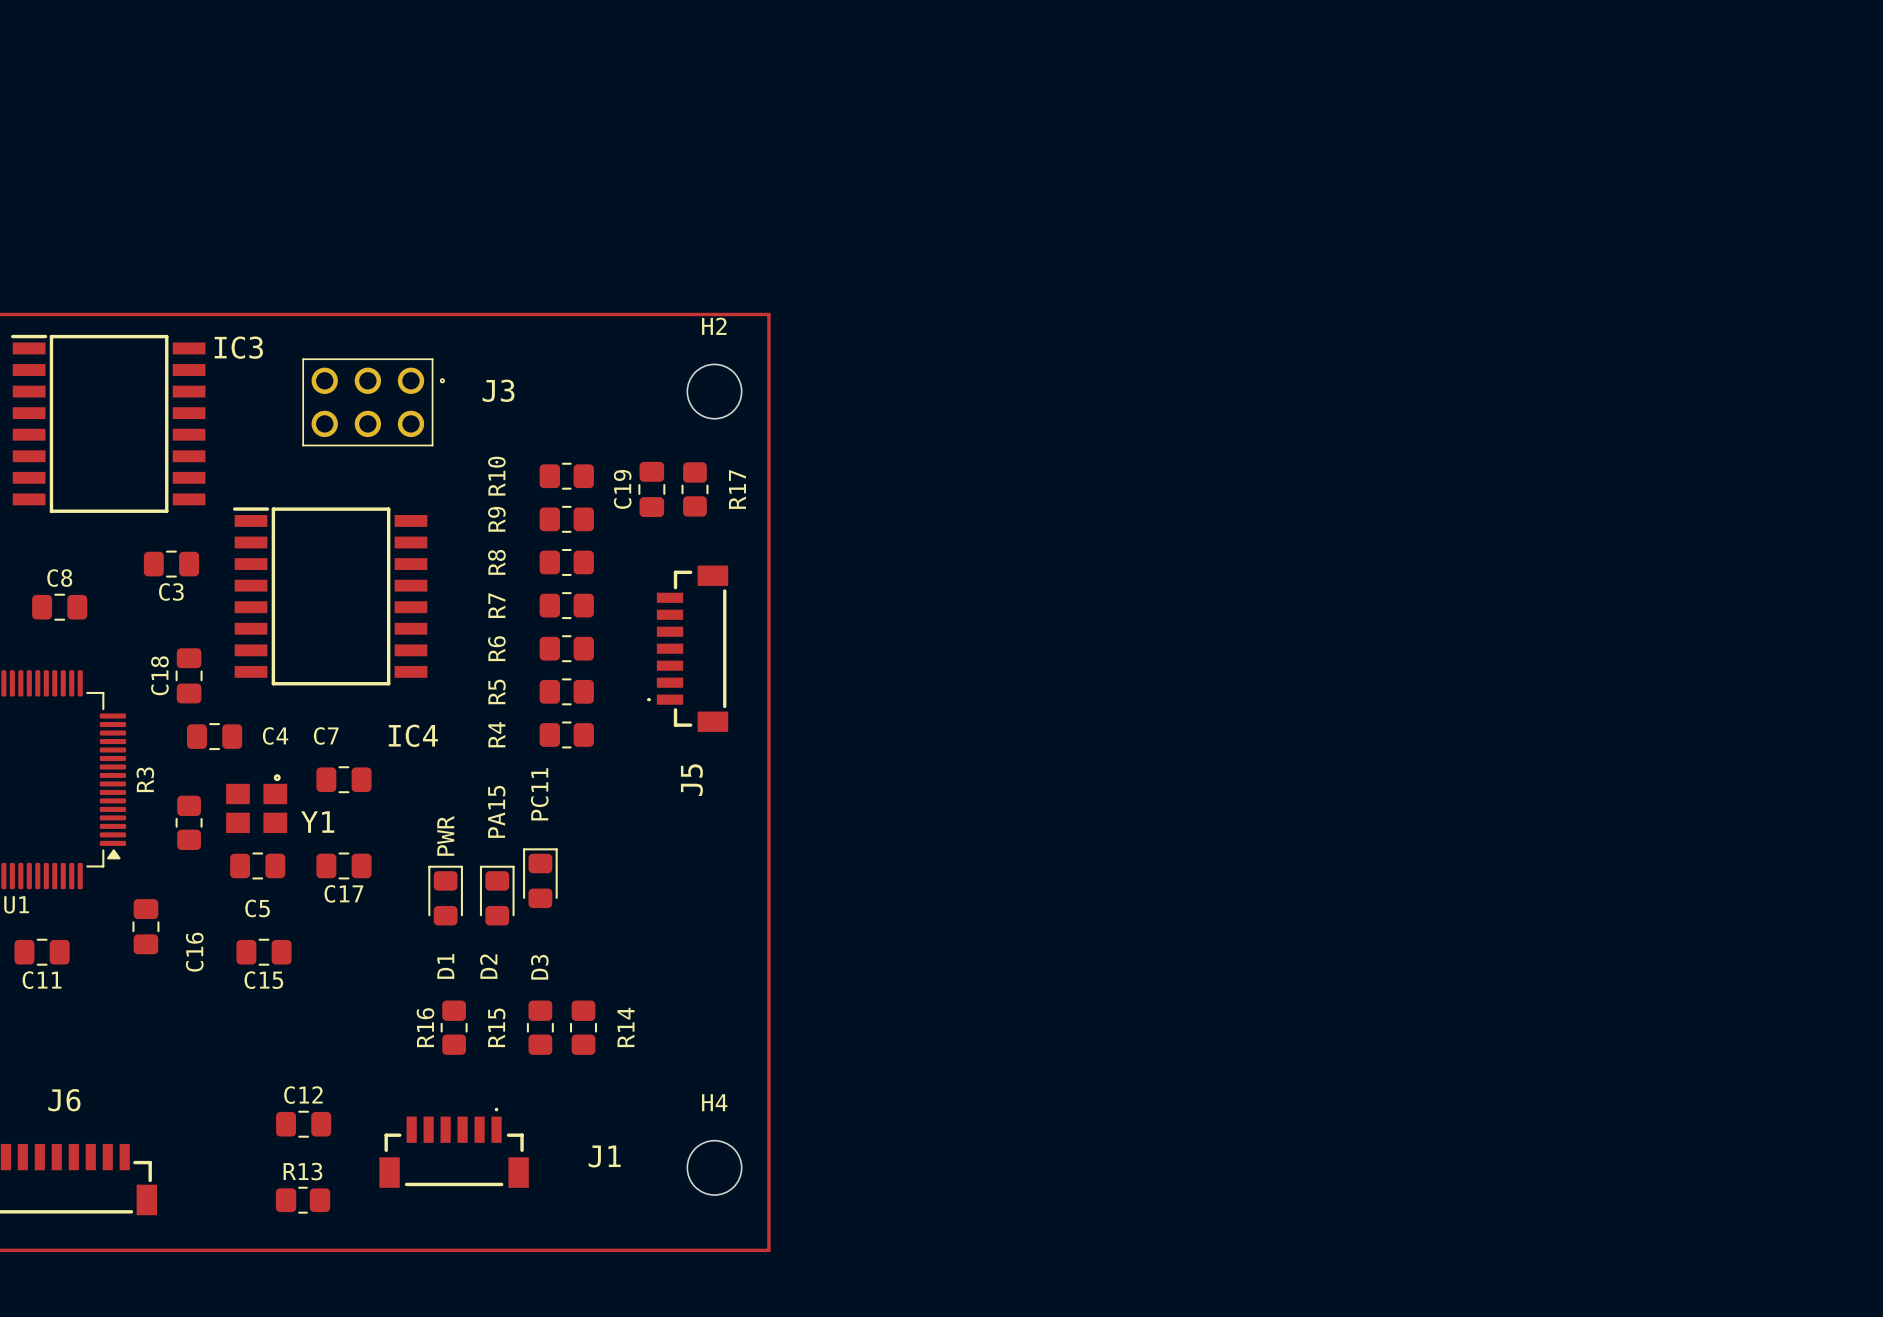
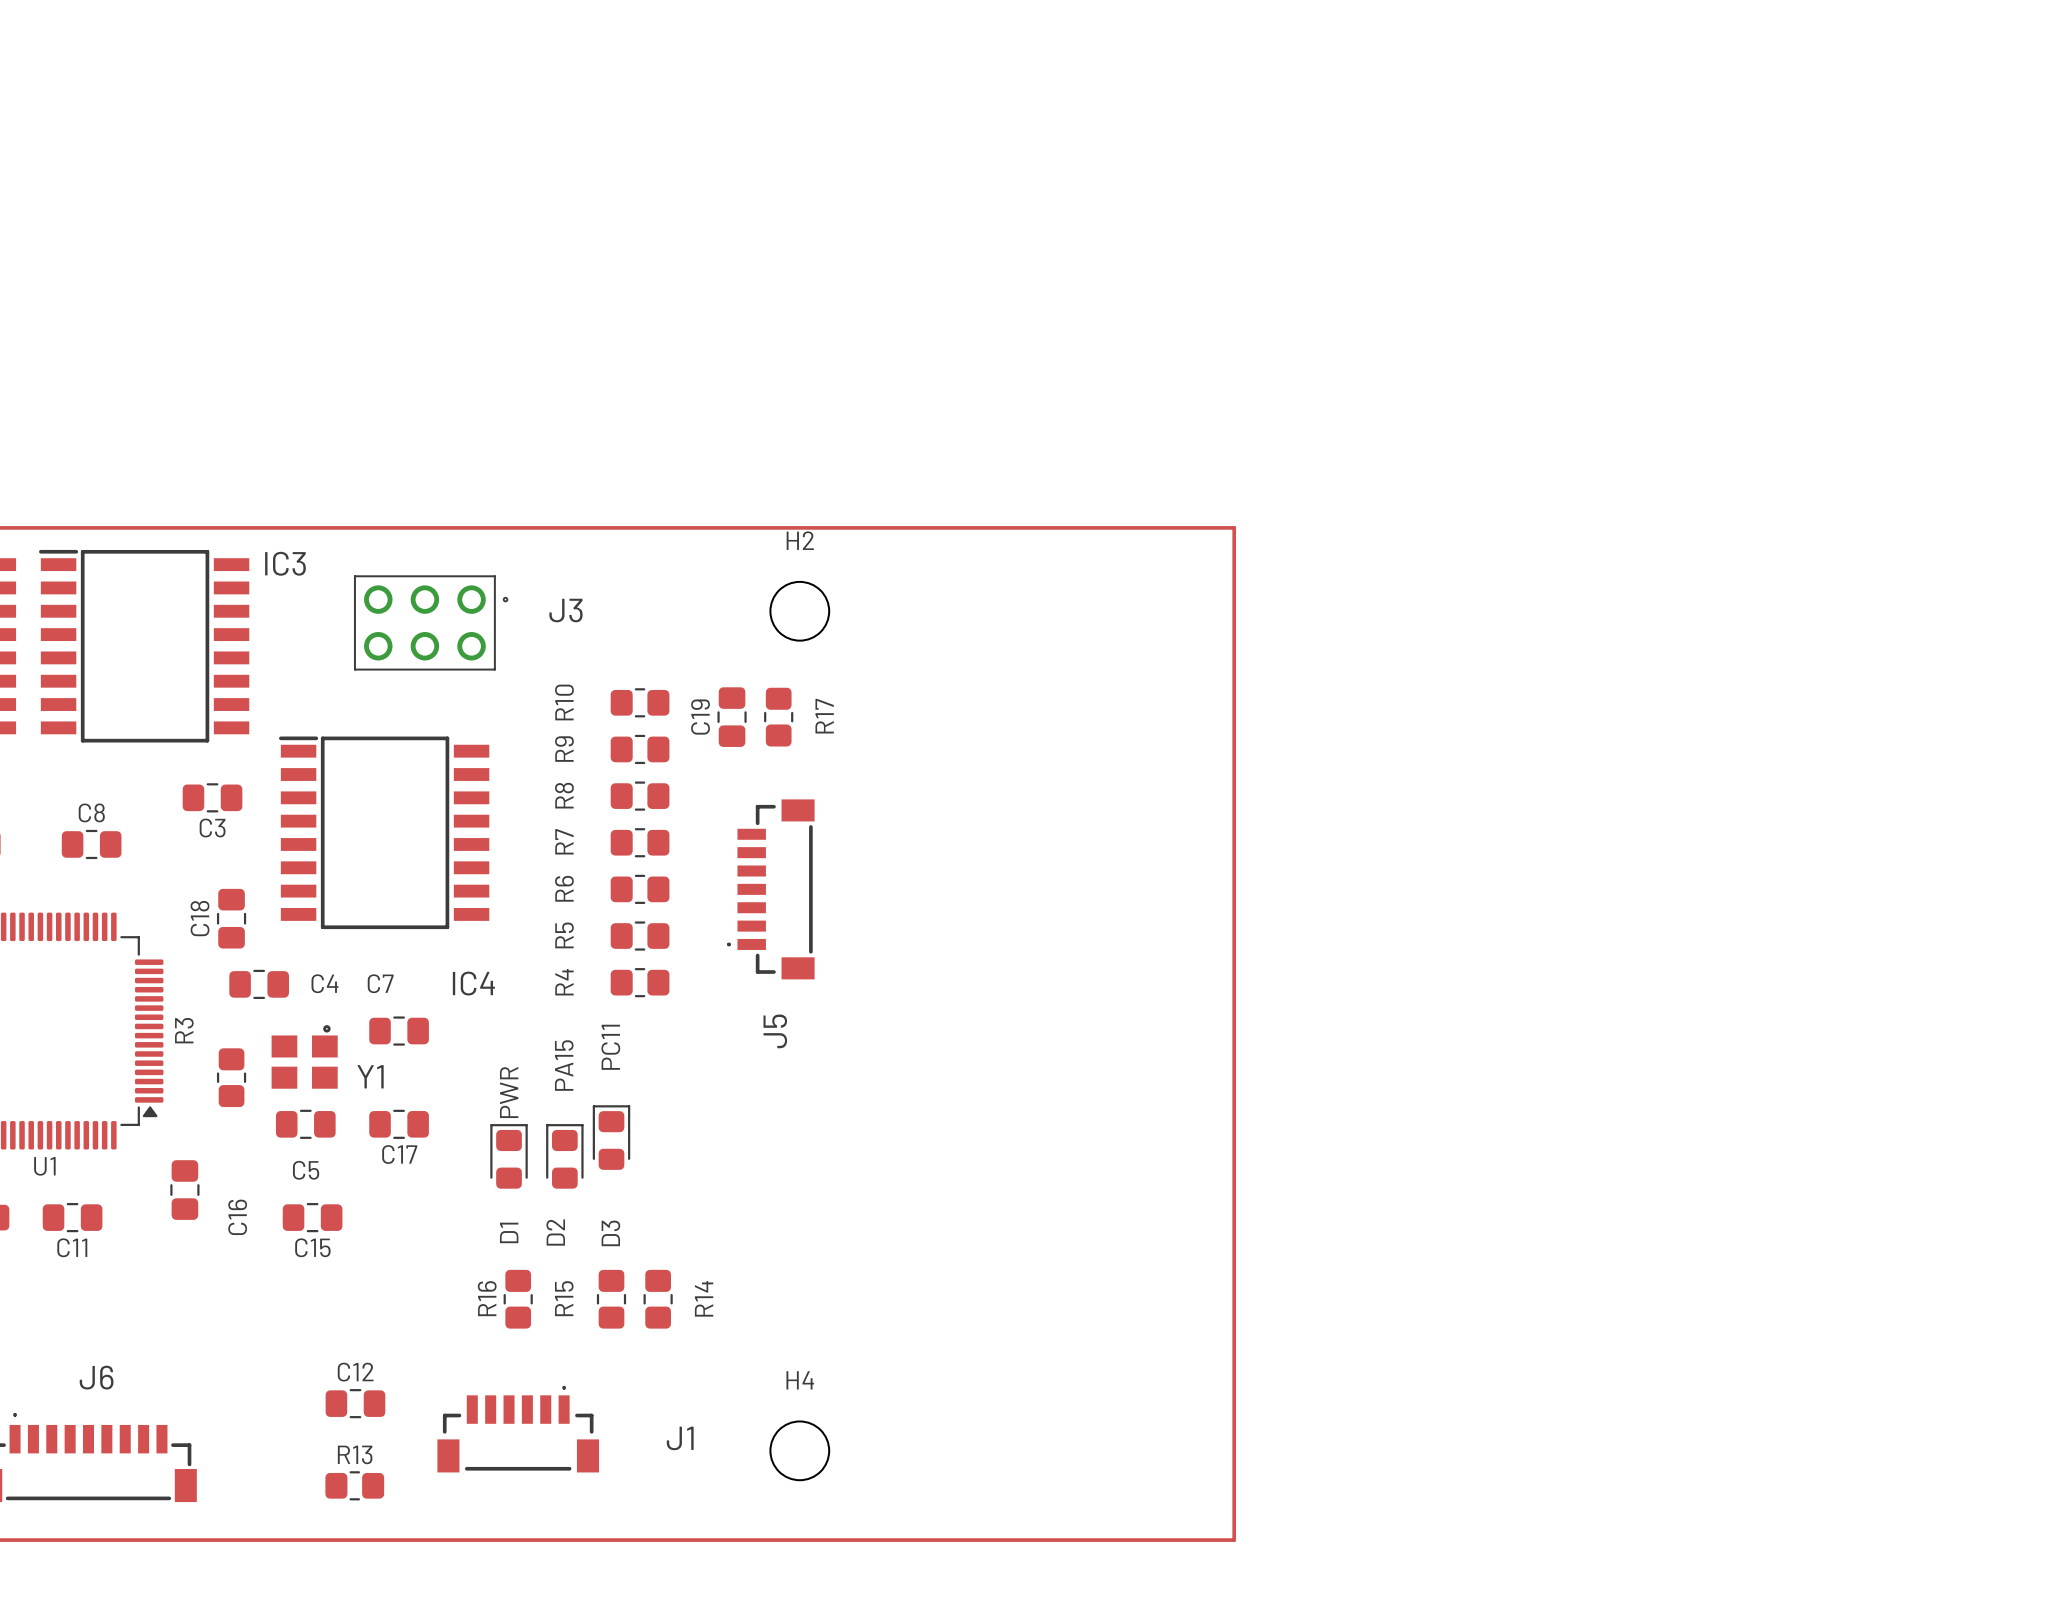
top track: (768, 314) (768, 1250) -> (858, 527) (1234, 527) (1234, 1540) (858, 1540)

